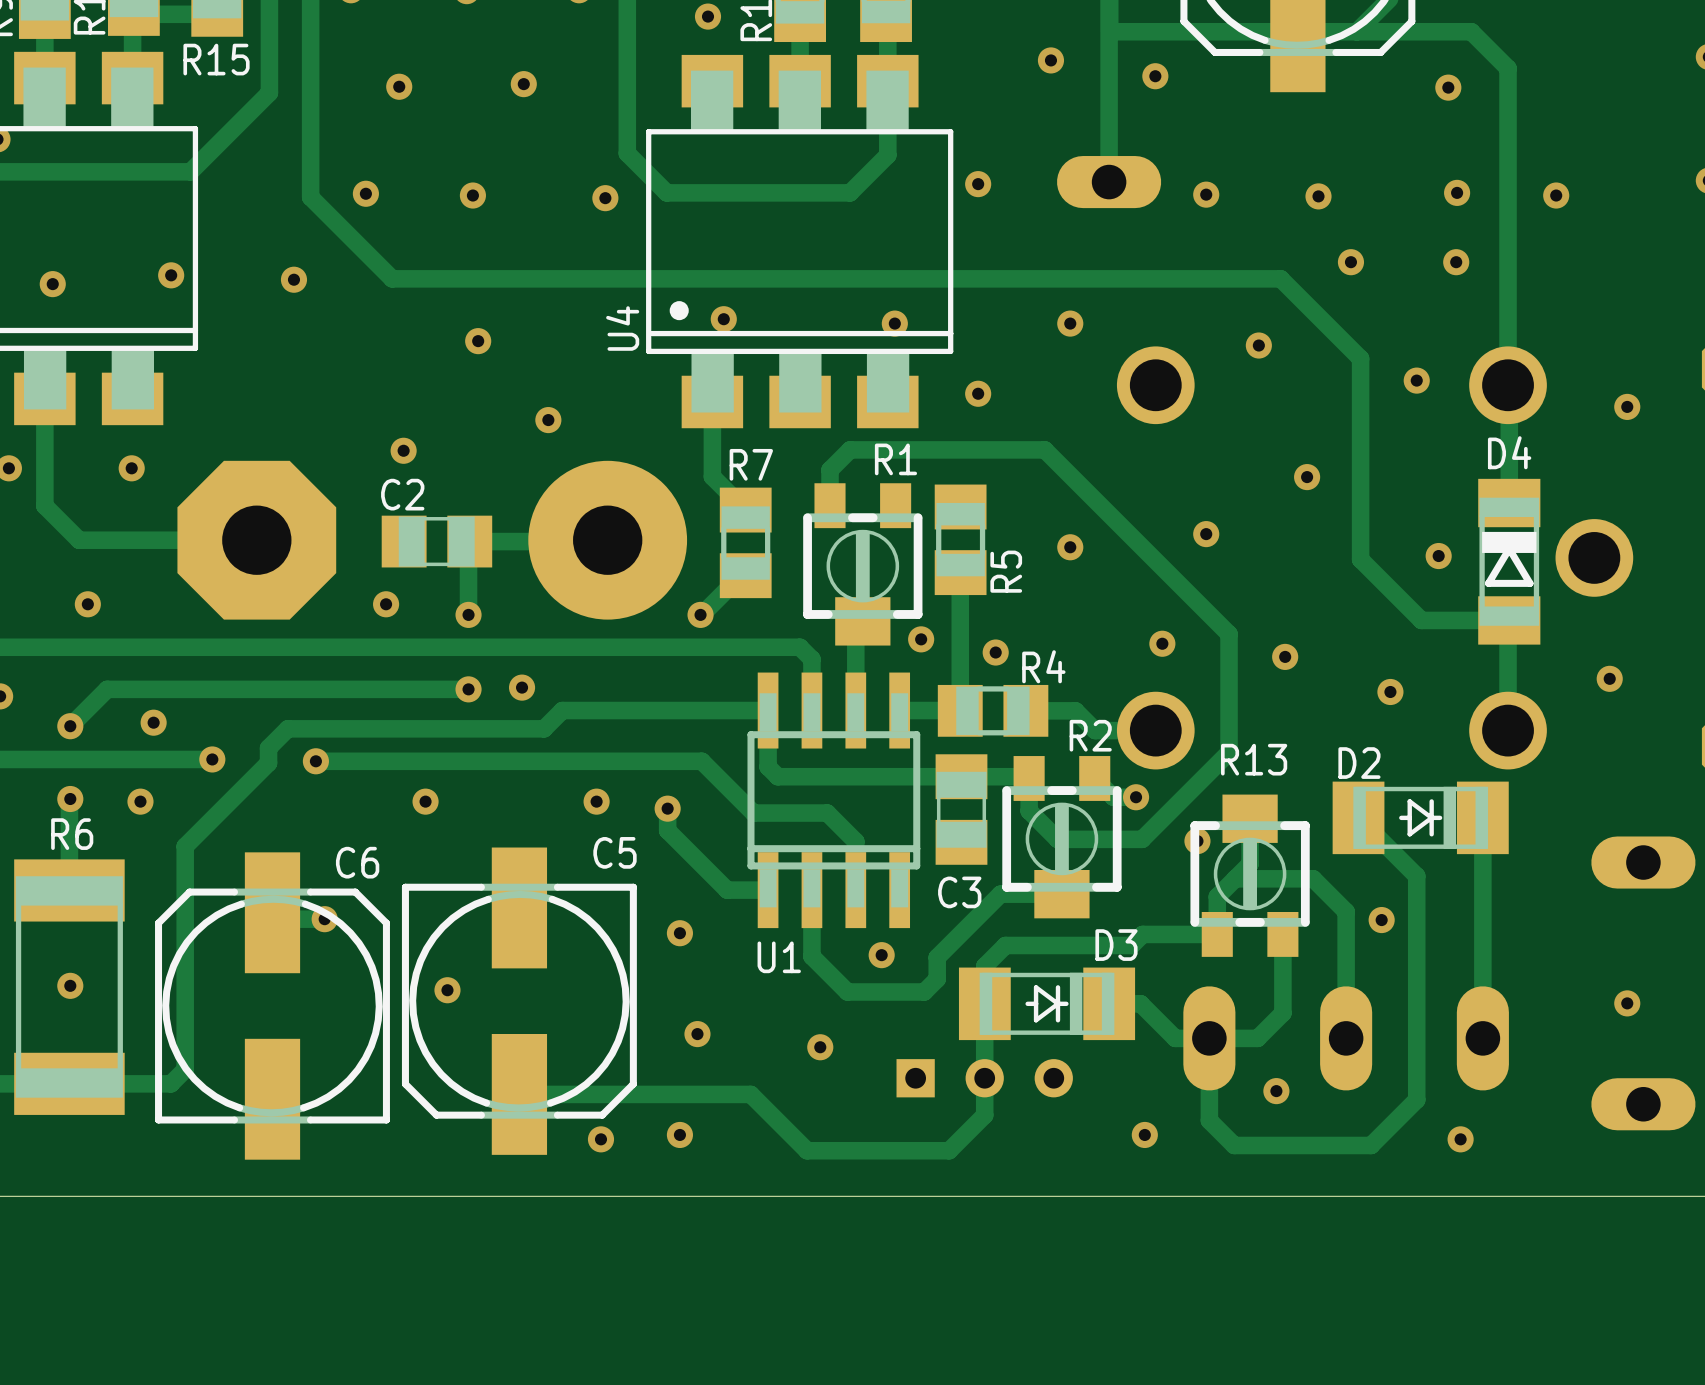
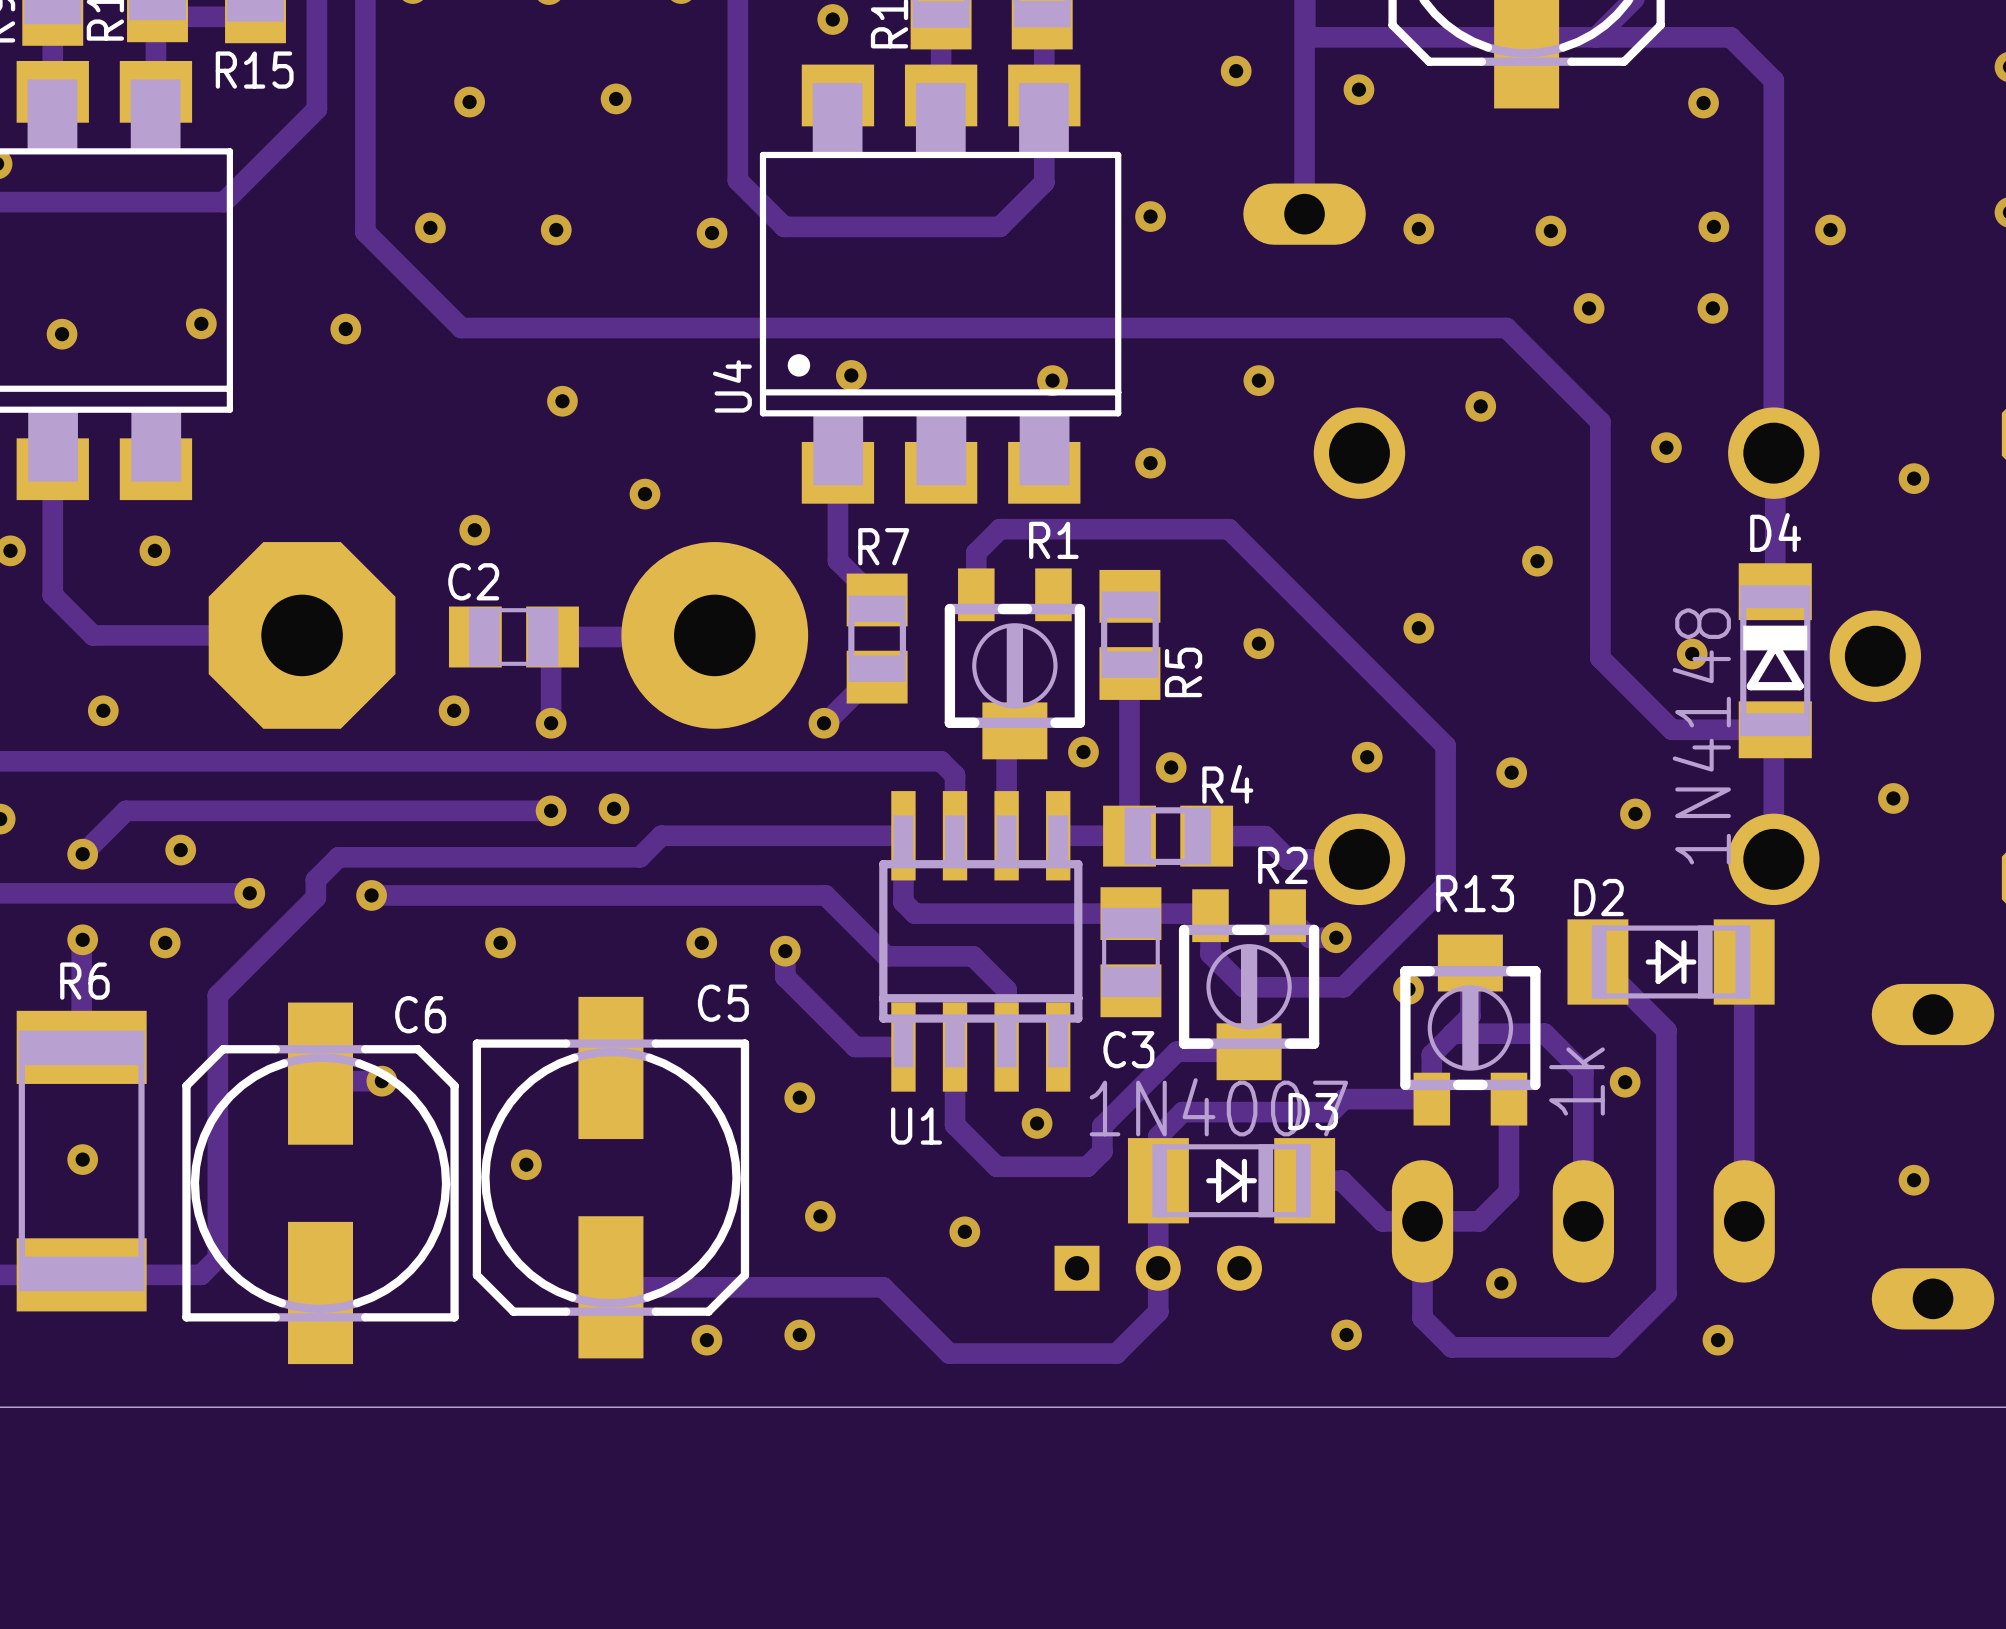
D4 value: none -> 1N4148 (1701, 736)
R13 value: none -> 1k (1577, 1081)
D3 value: none -> 1N4007 (1218, 1107)

